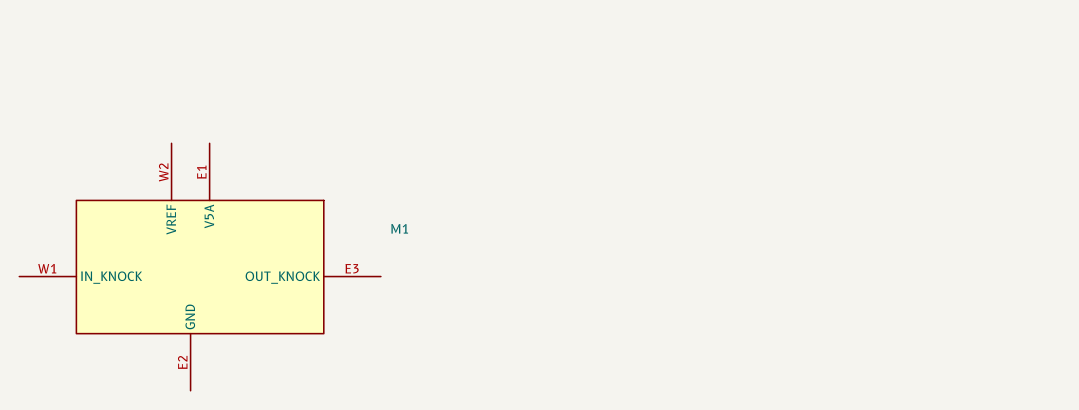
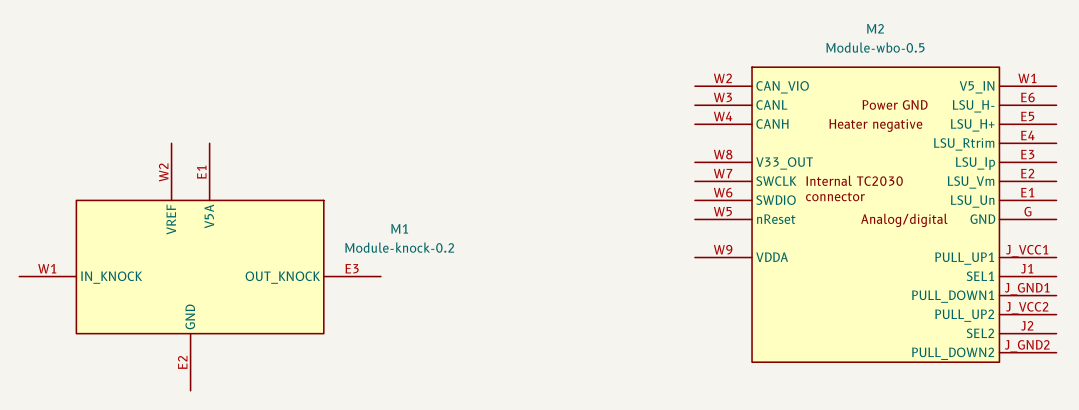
M2: none -> Module-wbo-0.5 (875, 214)
M1 value: none -> Module-knock-0.2 (399, 247)

